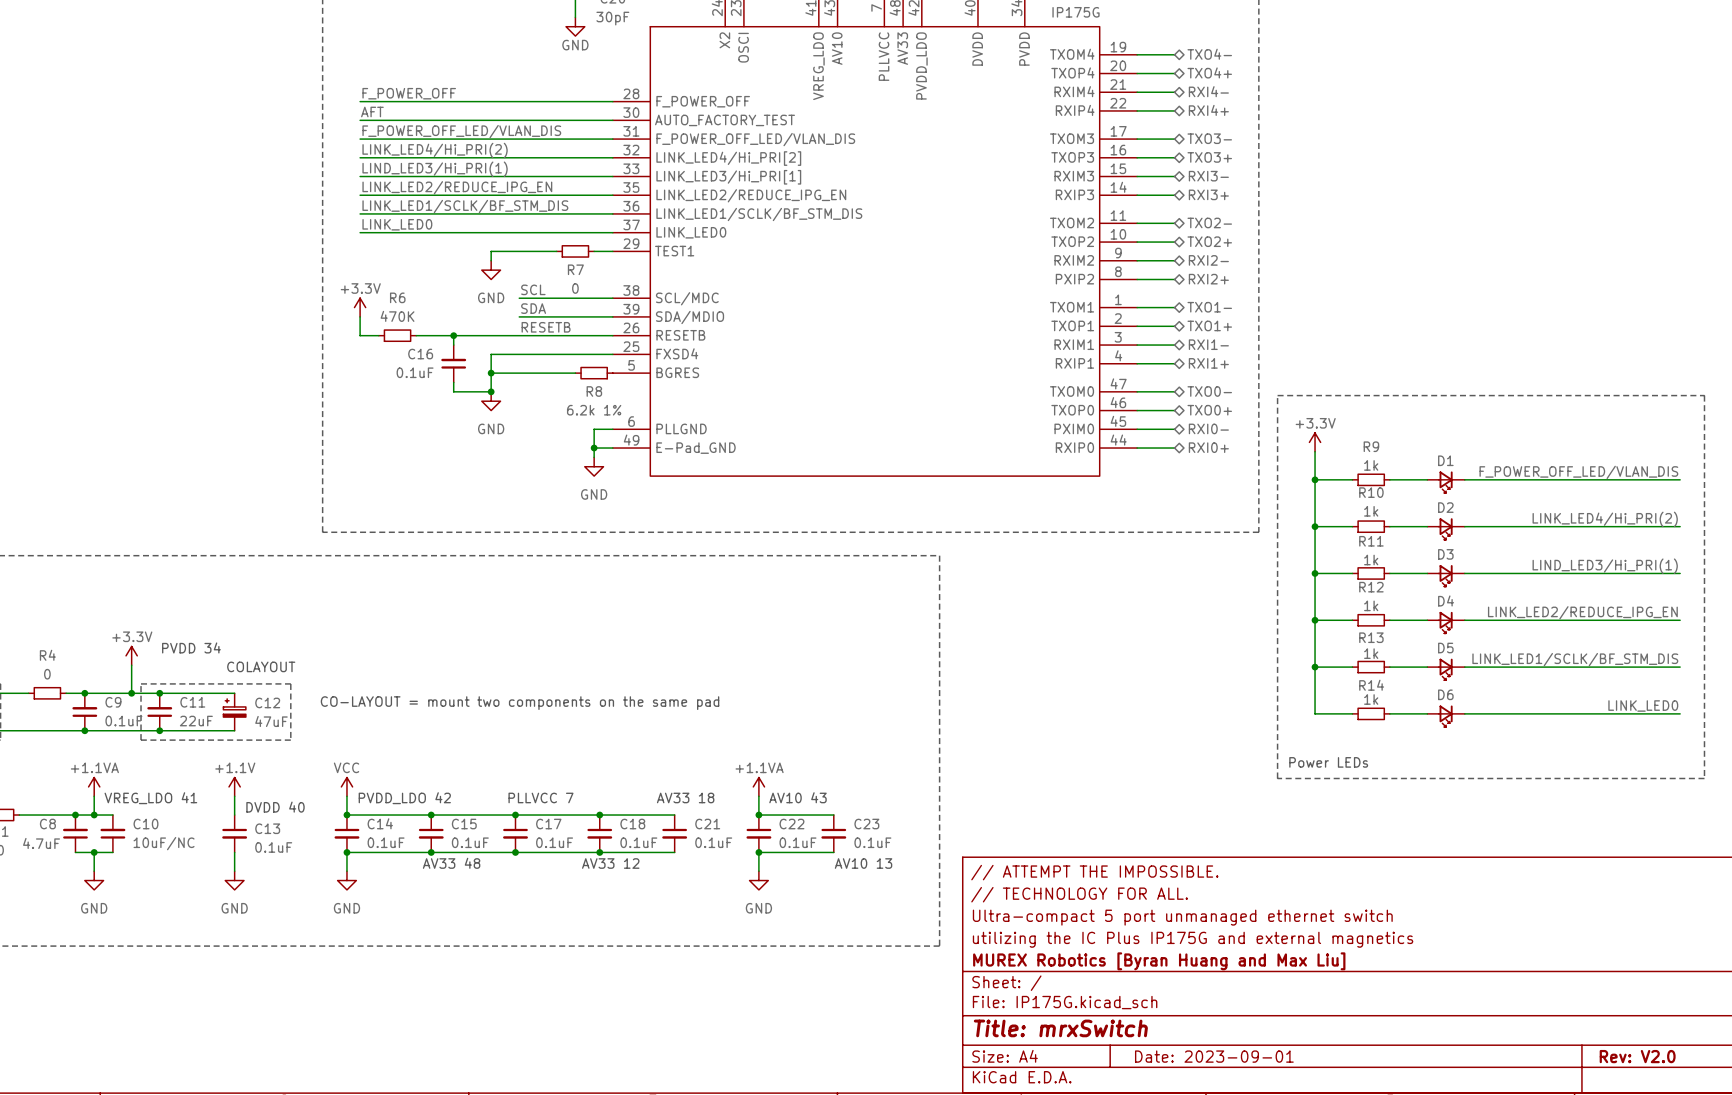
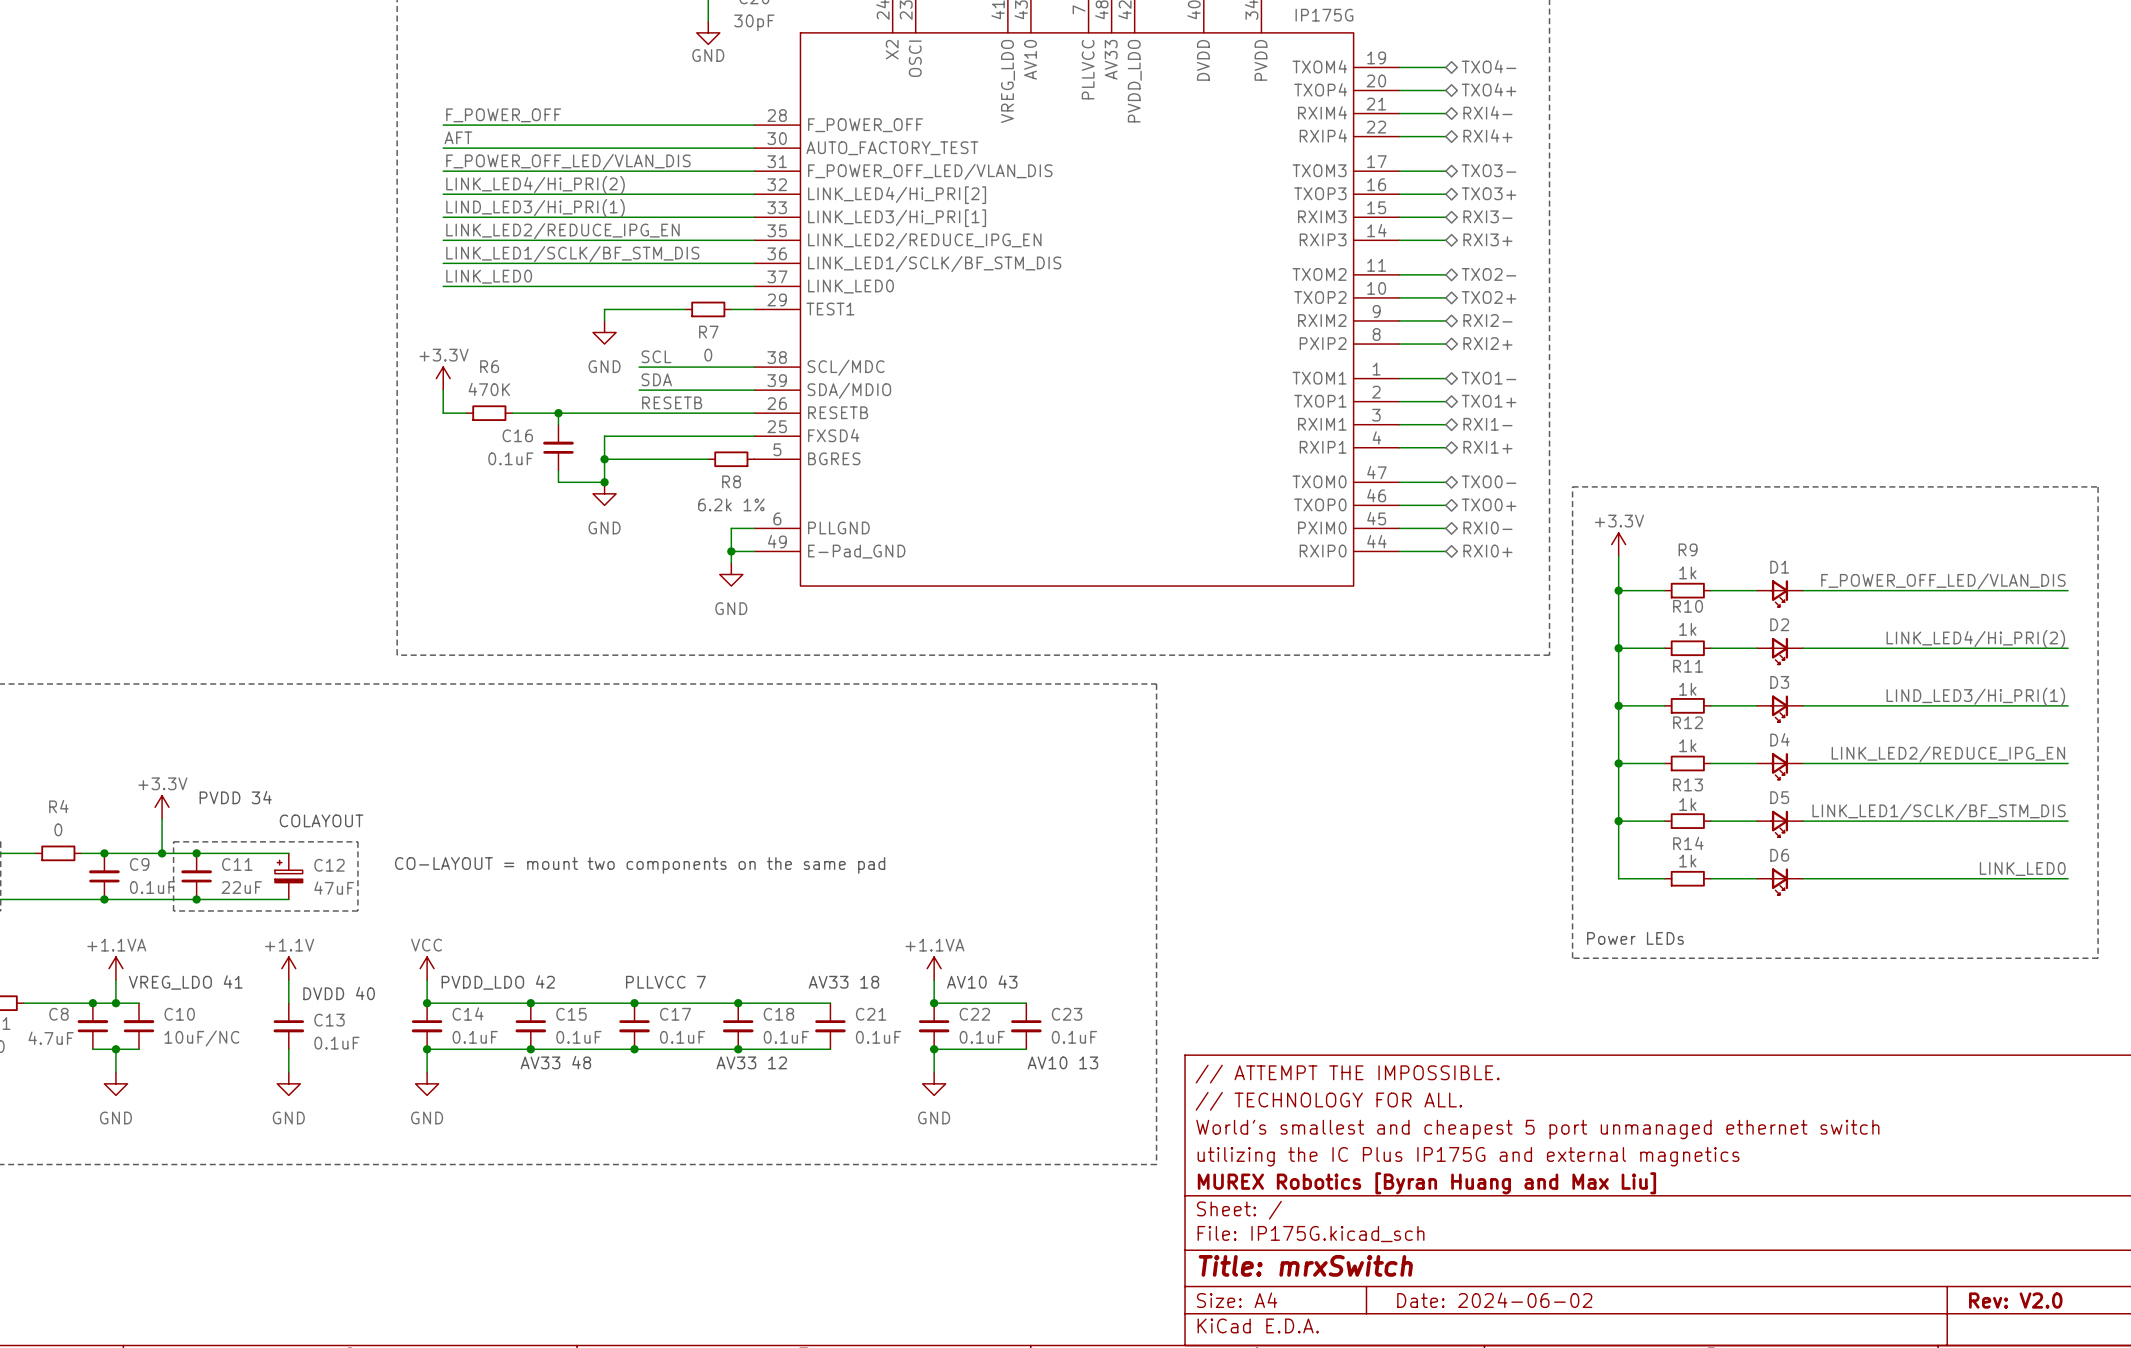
title block: Ultra-compact 5 port unmanaged ethernet switch (1182, 917) -> World's smallest and cheapest 5 port unmanaged ethernet switch (1537, 1129)
title block: Date: 2023-09-01 (1214, 1056) -> Date: 2024-06-02 (1494, 1300)

